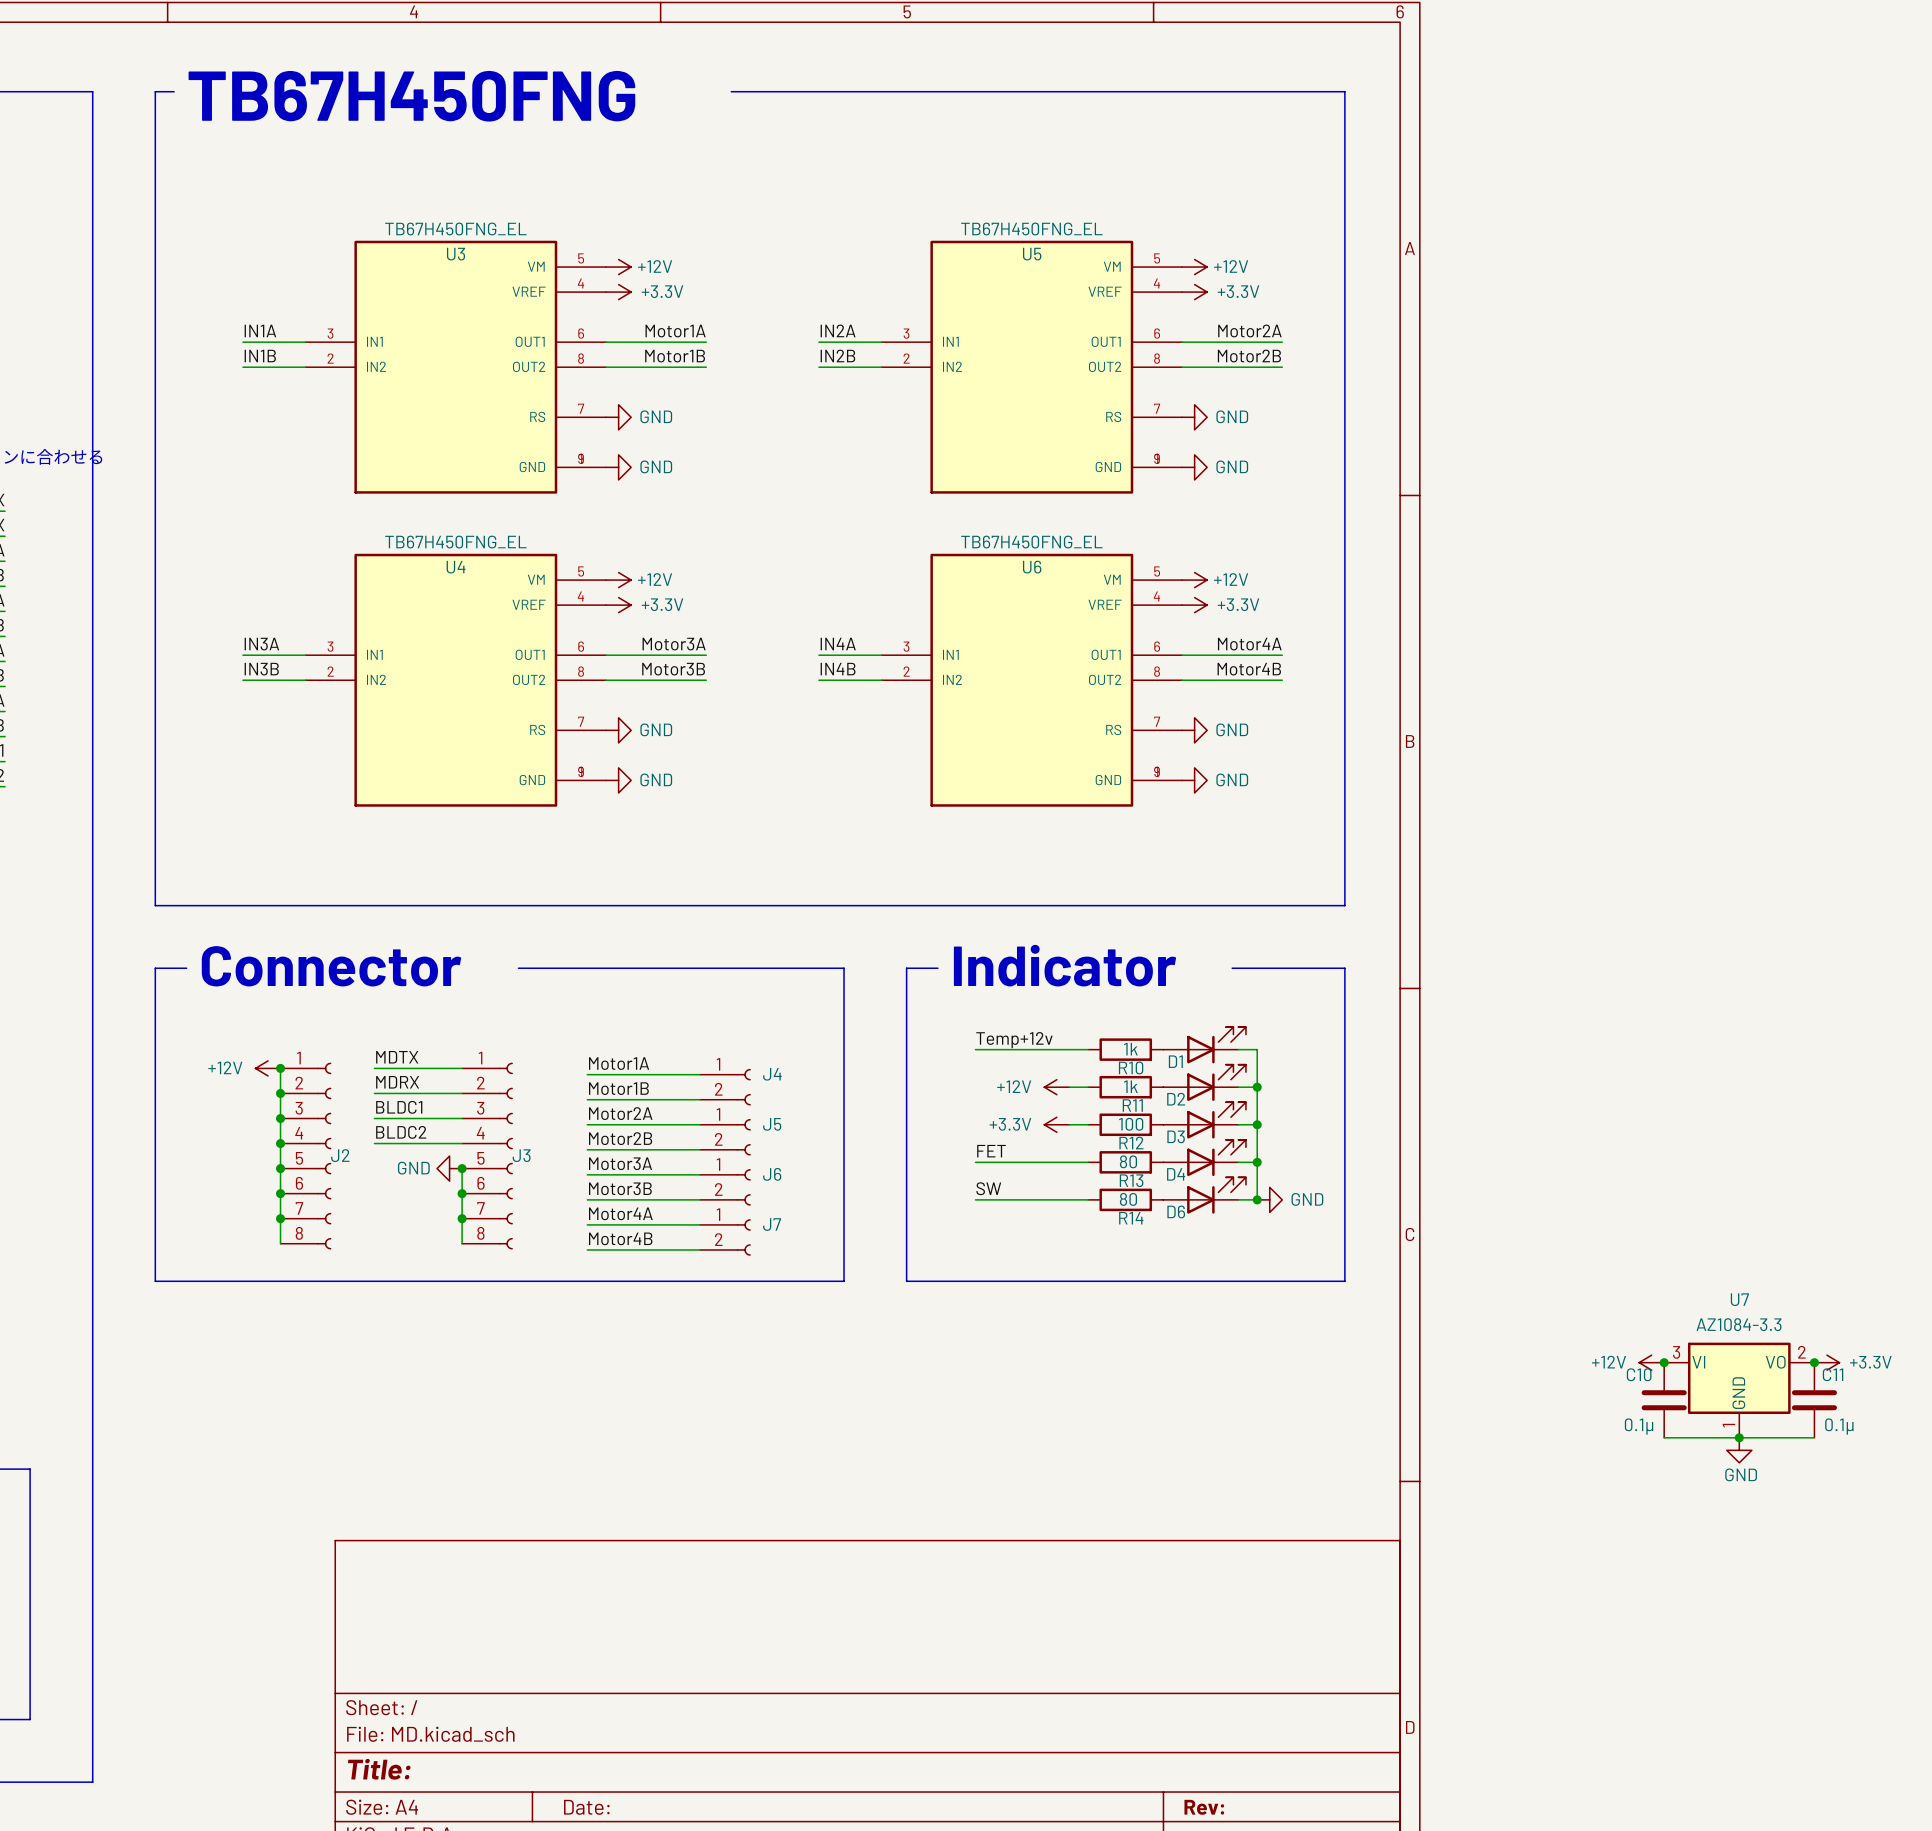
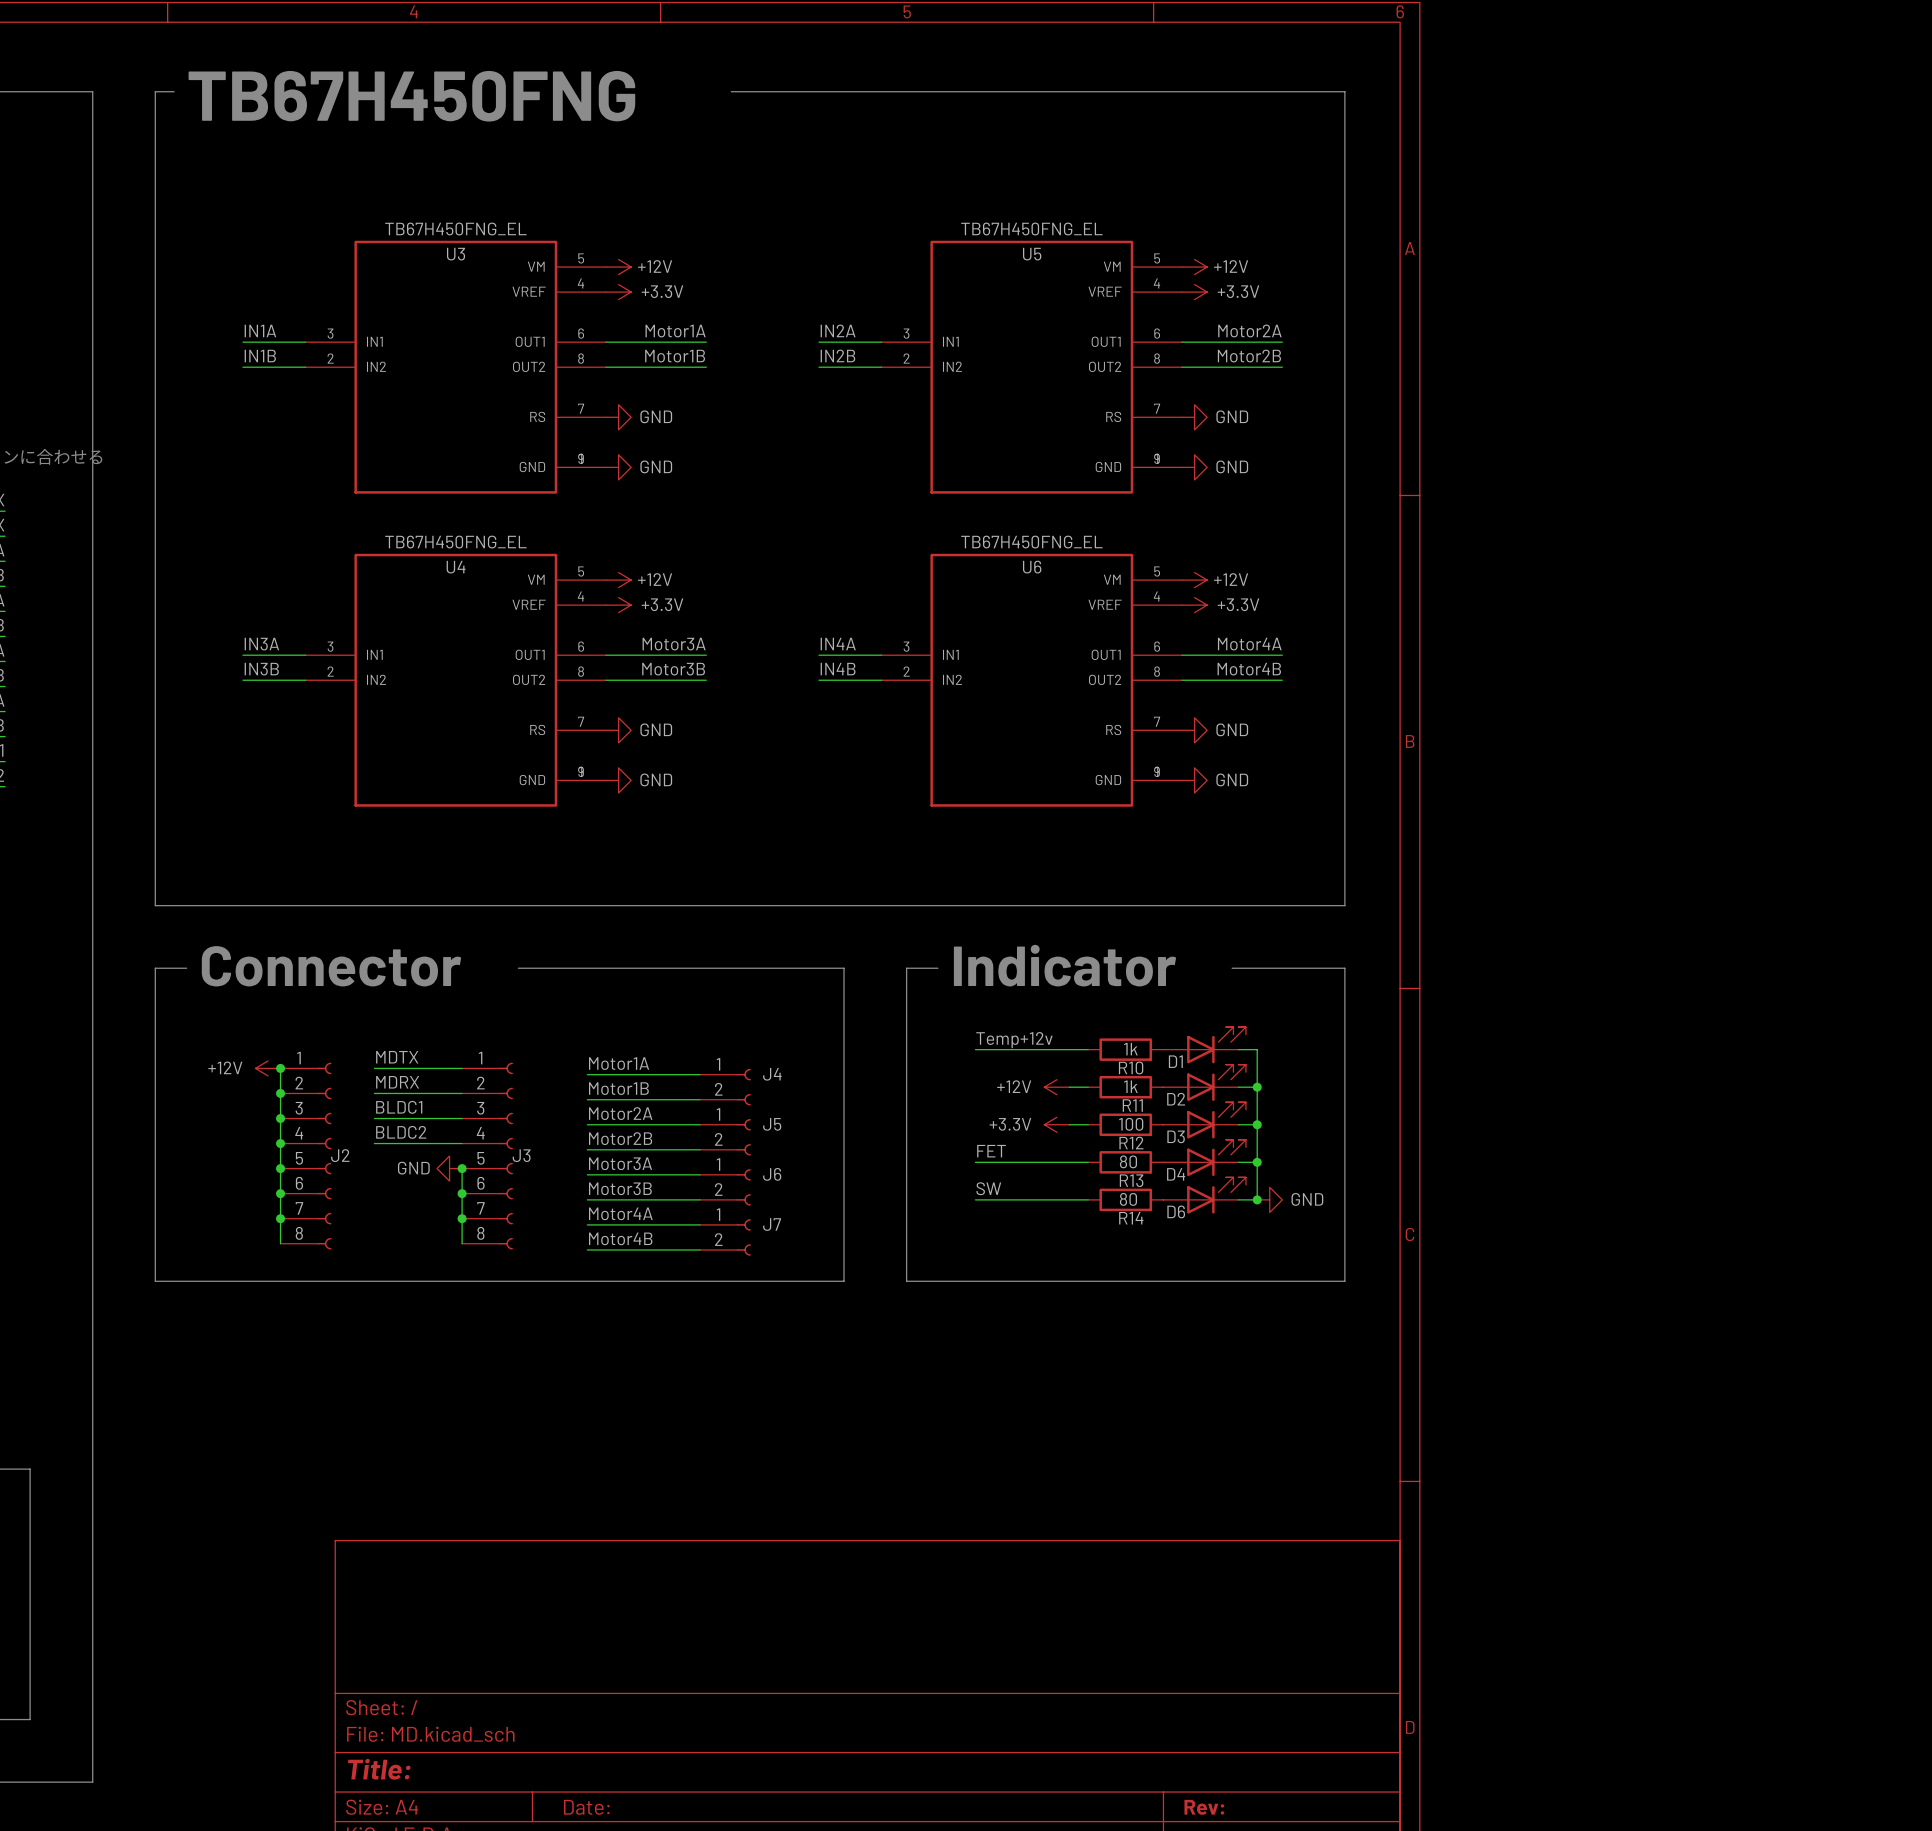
power symbol: +12V (1651, 1362) -> none
junction: (1664, 1362) -> none
junction: (1814, 1362) -> none
power symbol: +3.3V (1826, 1362) -> none
U7: AZ1084-3.3 (1739, 1390) -> none
C10: 0.1μ (1664, 1400) -> none
C11: 0.1μ (1814, 1400) -> none
wire: (1664, 1437) (1814, 1437) -> none
junction: (1739, 1437) -> none
power symbol: GND (1739, 1450) -> none

